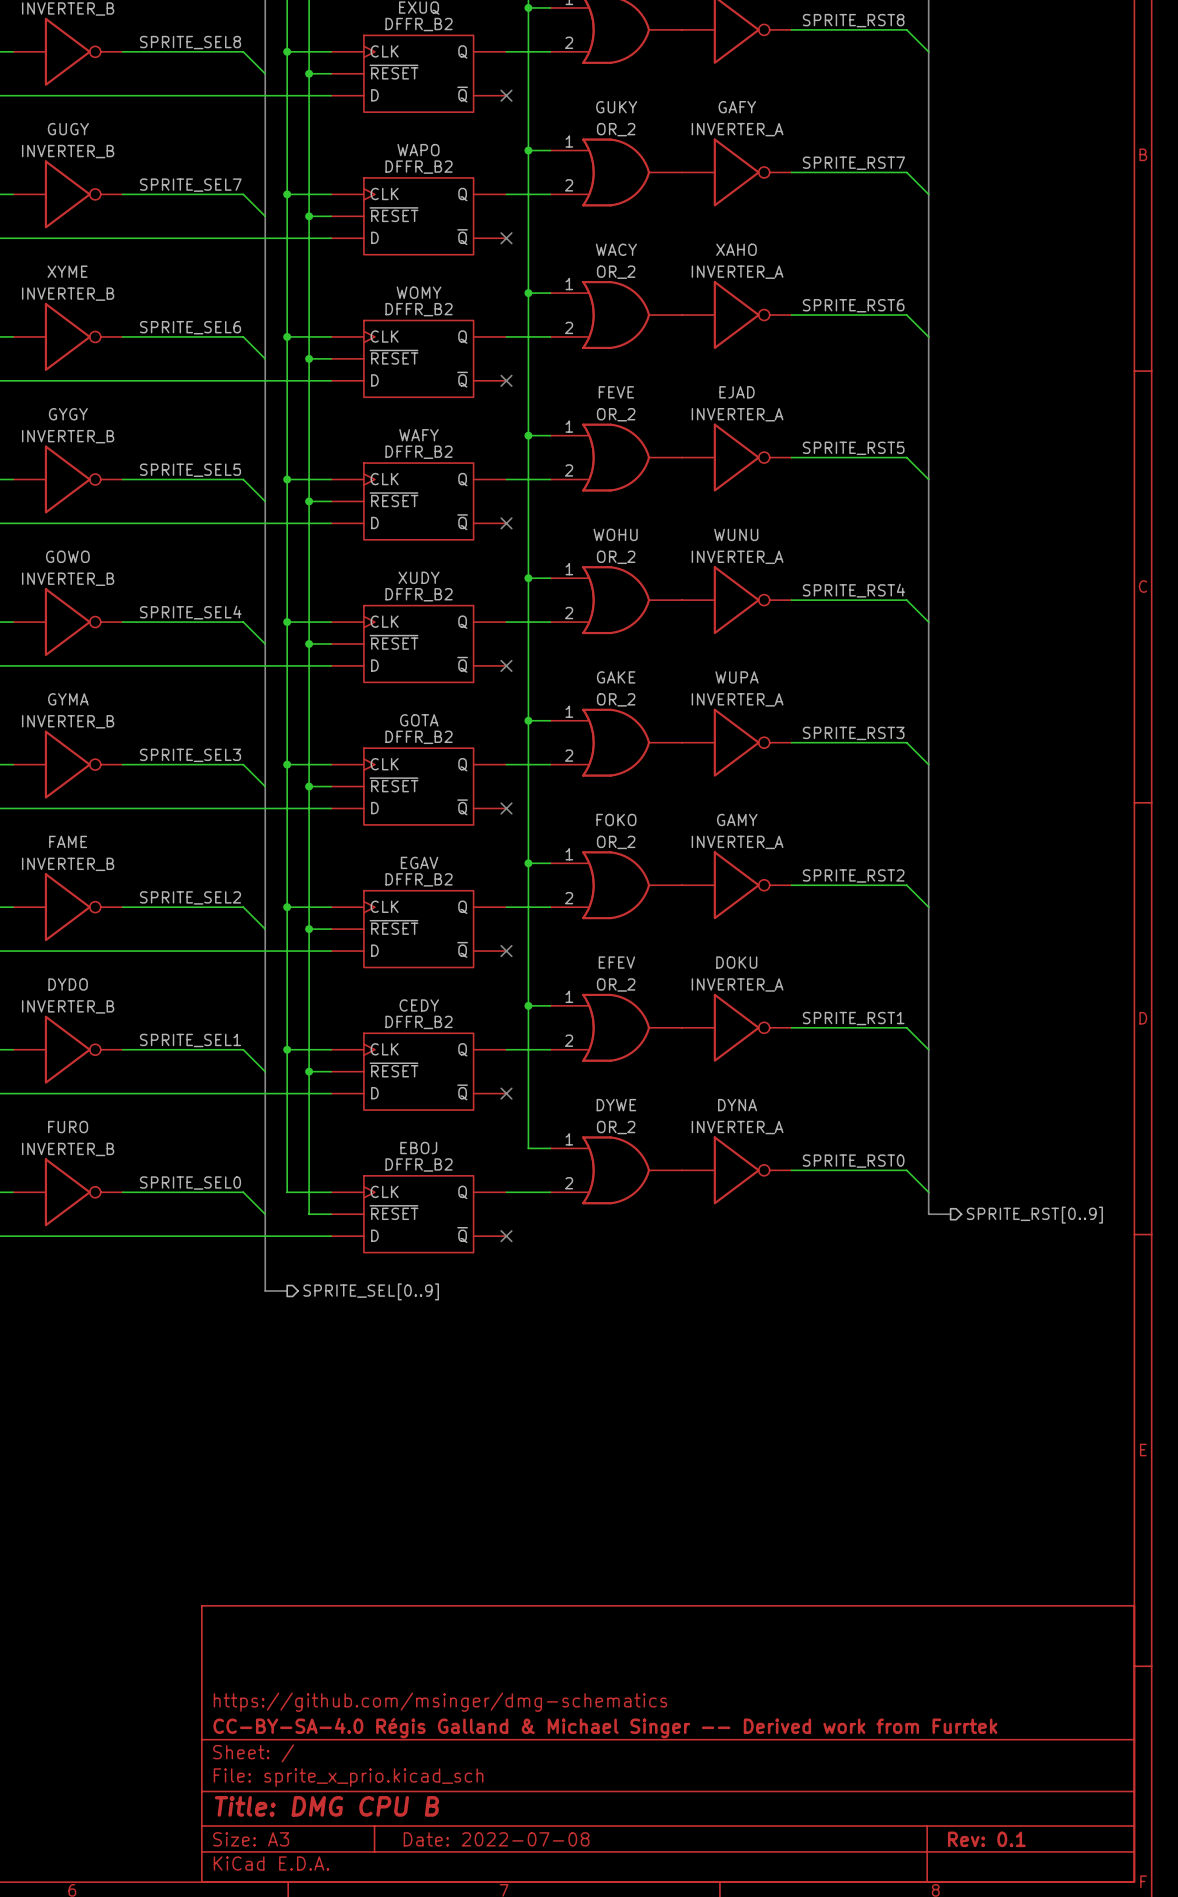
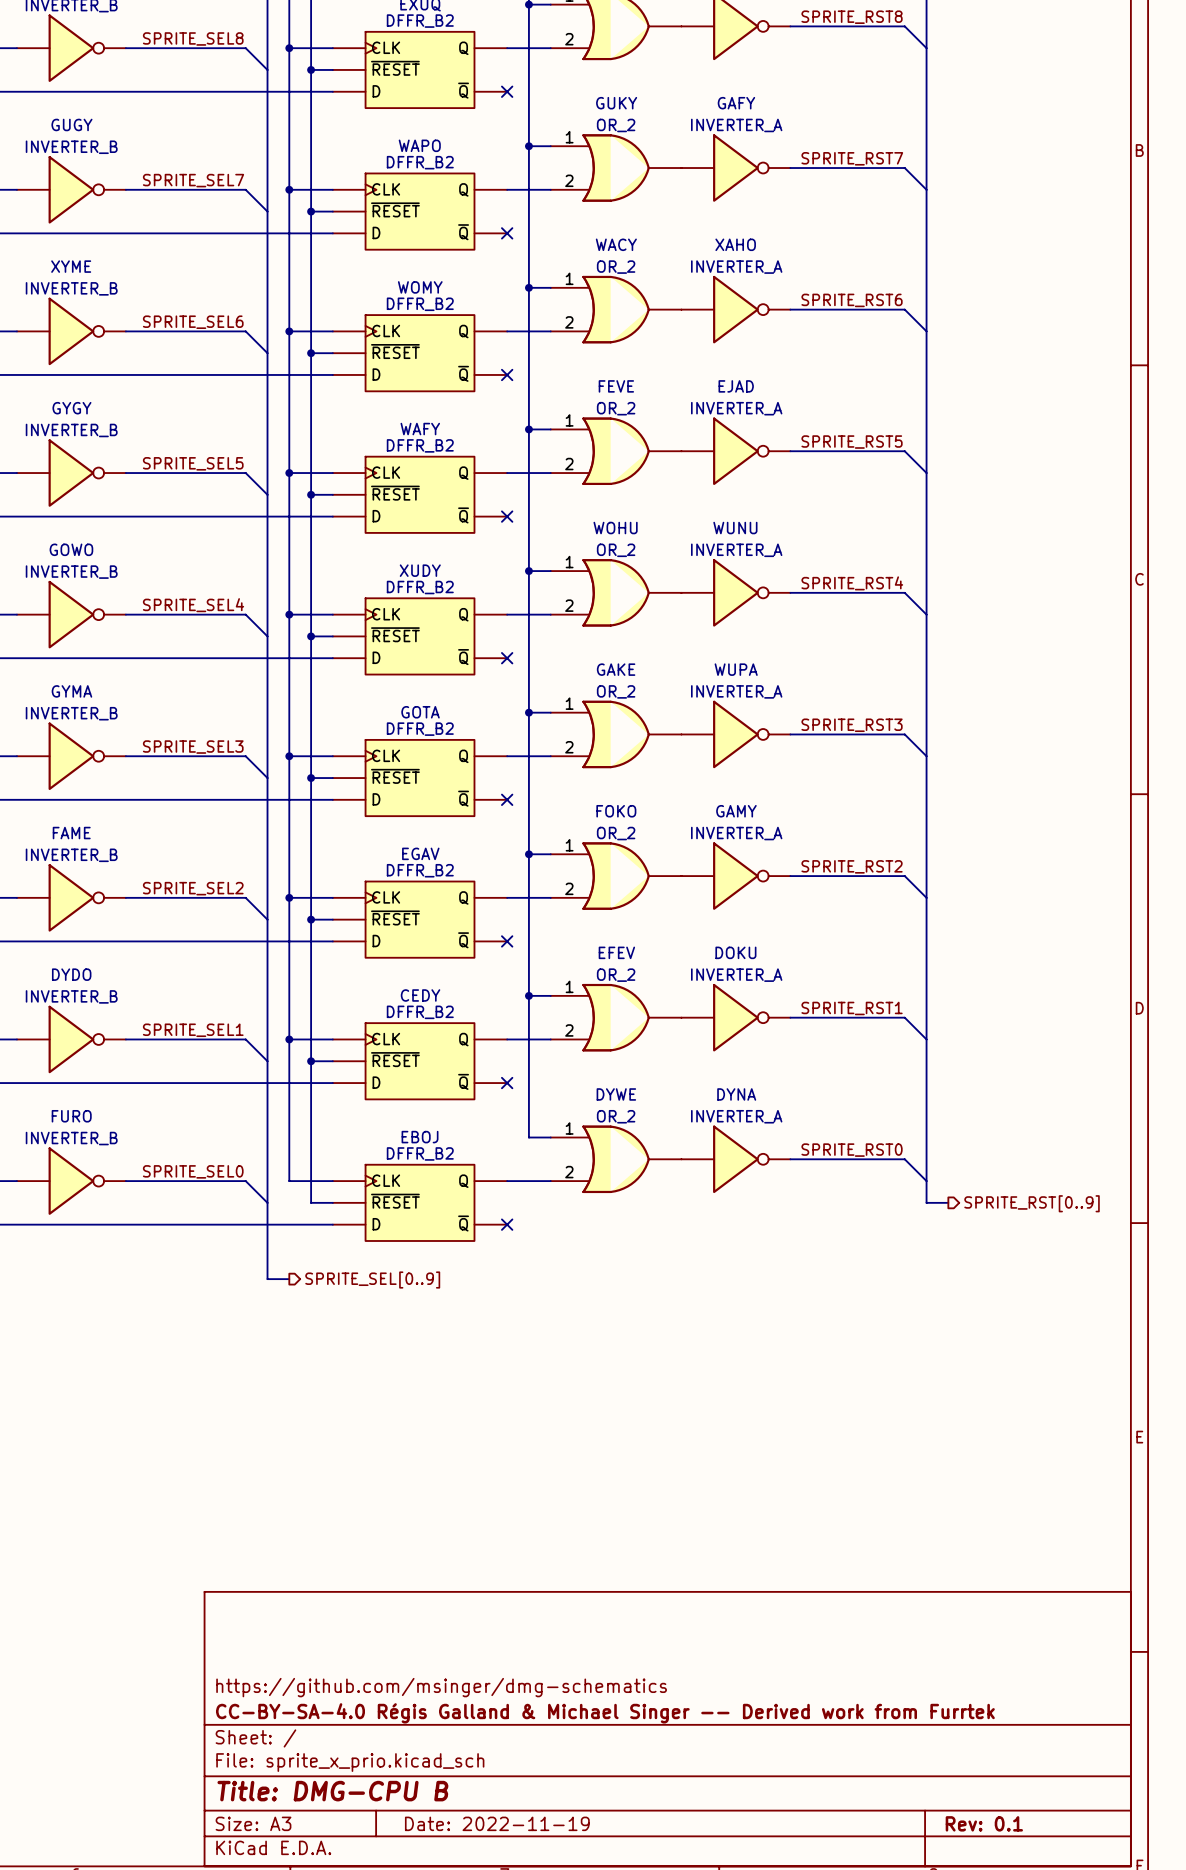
title block: Title: DMG CPU B (326, 1806) -> Title: DMG-CPU B (332, 1791)
title block: Date: 2022-07-08 (496, 1839) -> Date: 2022-11-19 (497, 1823)

